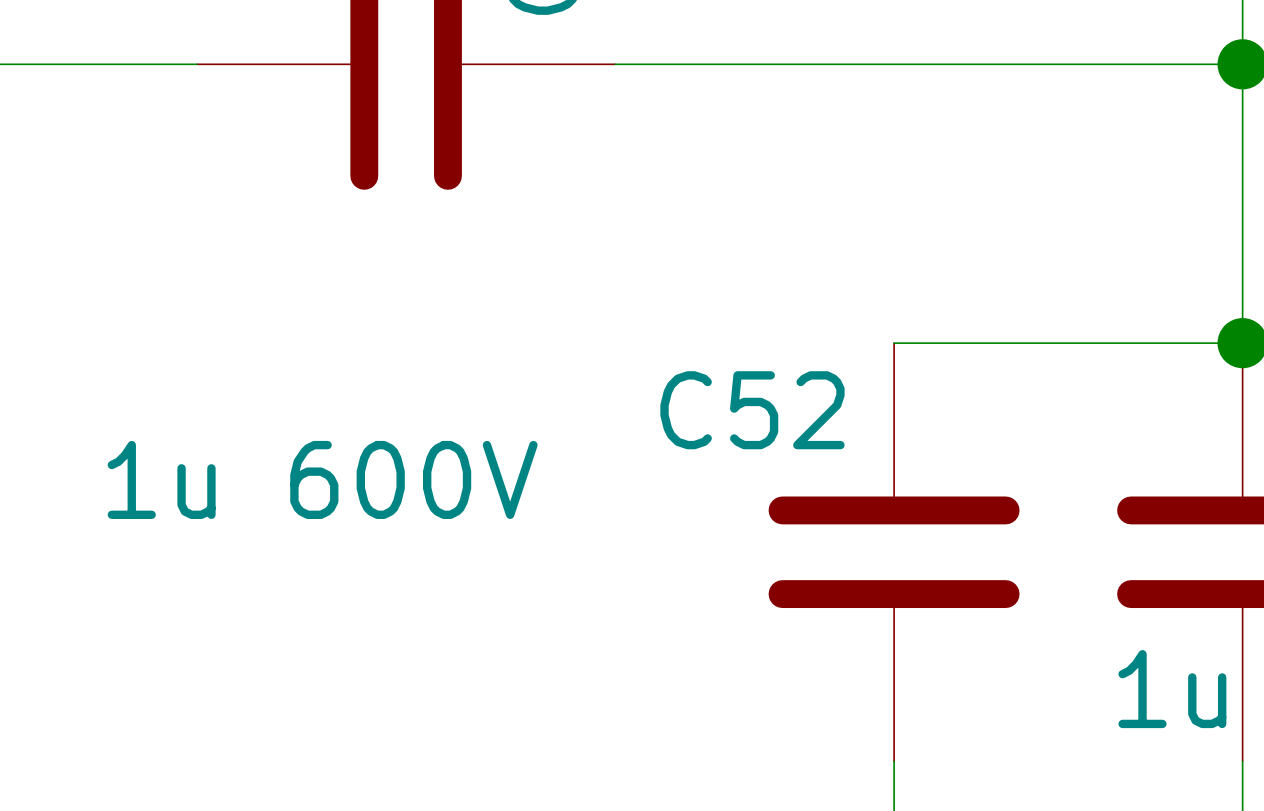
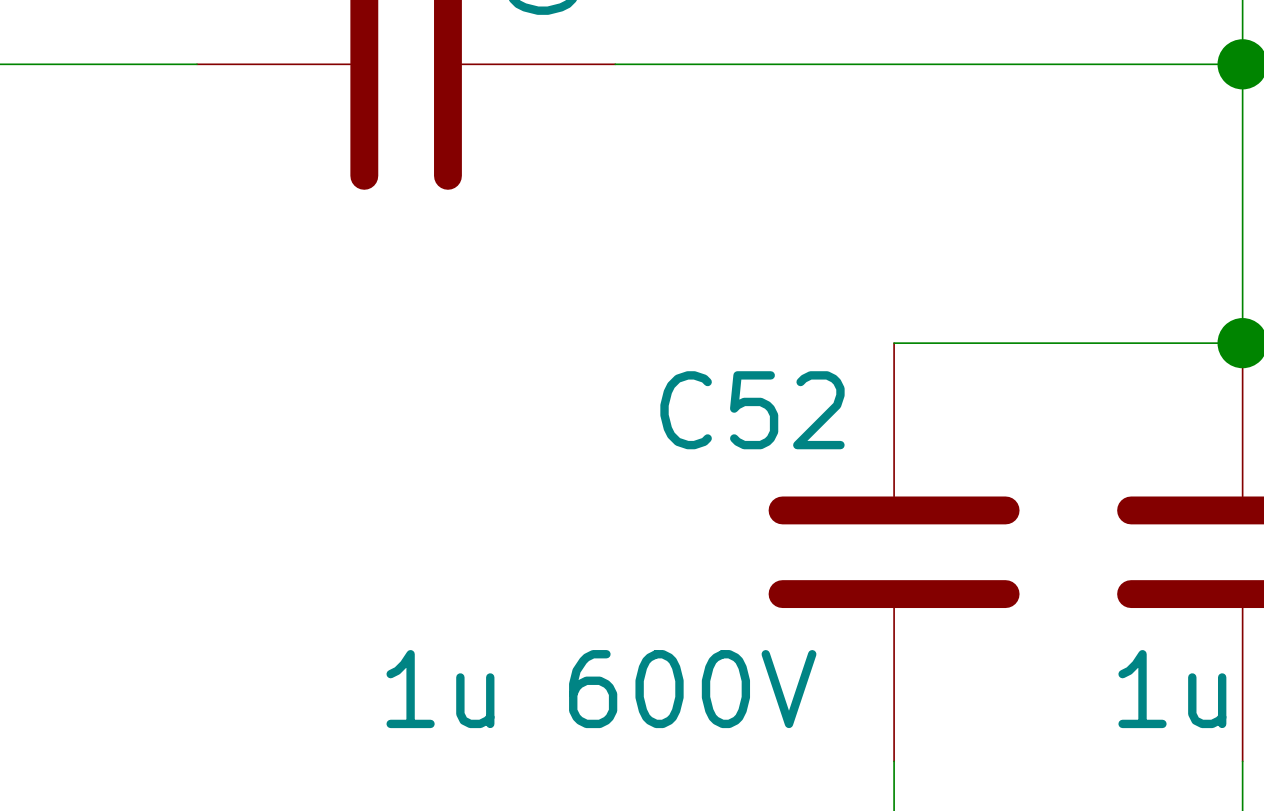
C52 value position: 1u 600V (322, 479) -> 1u 600V (601, 689)

